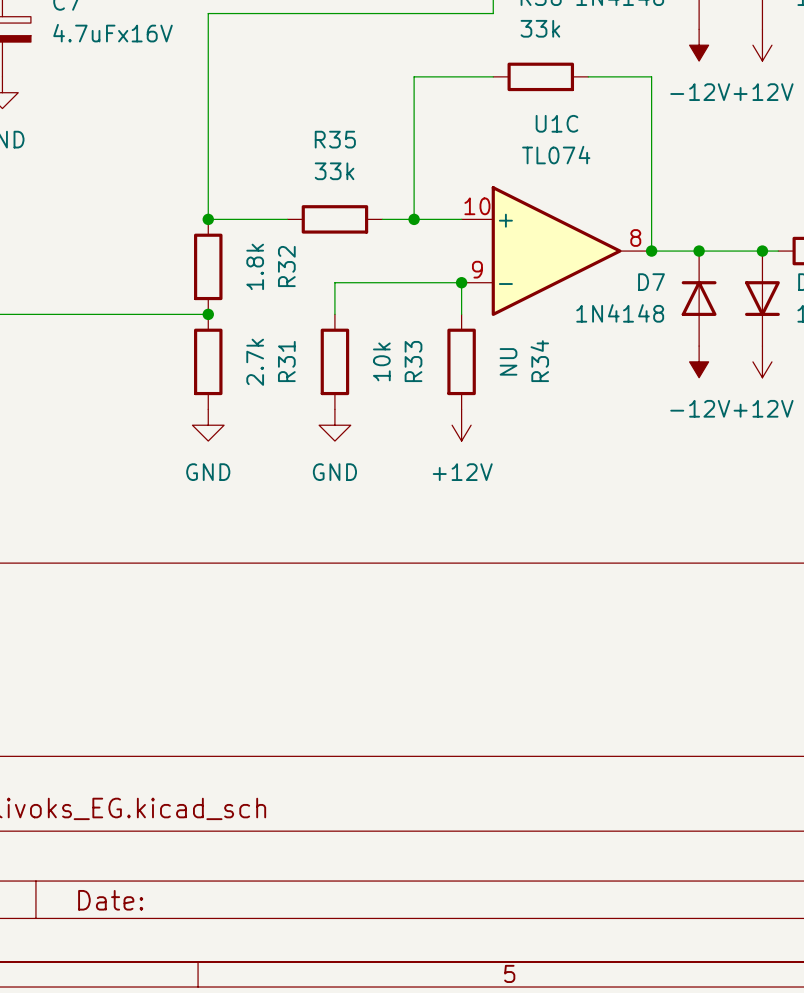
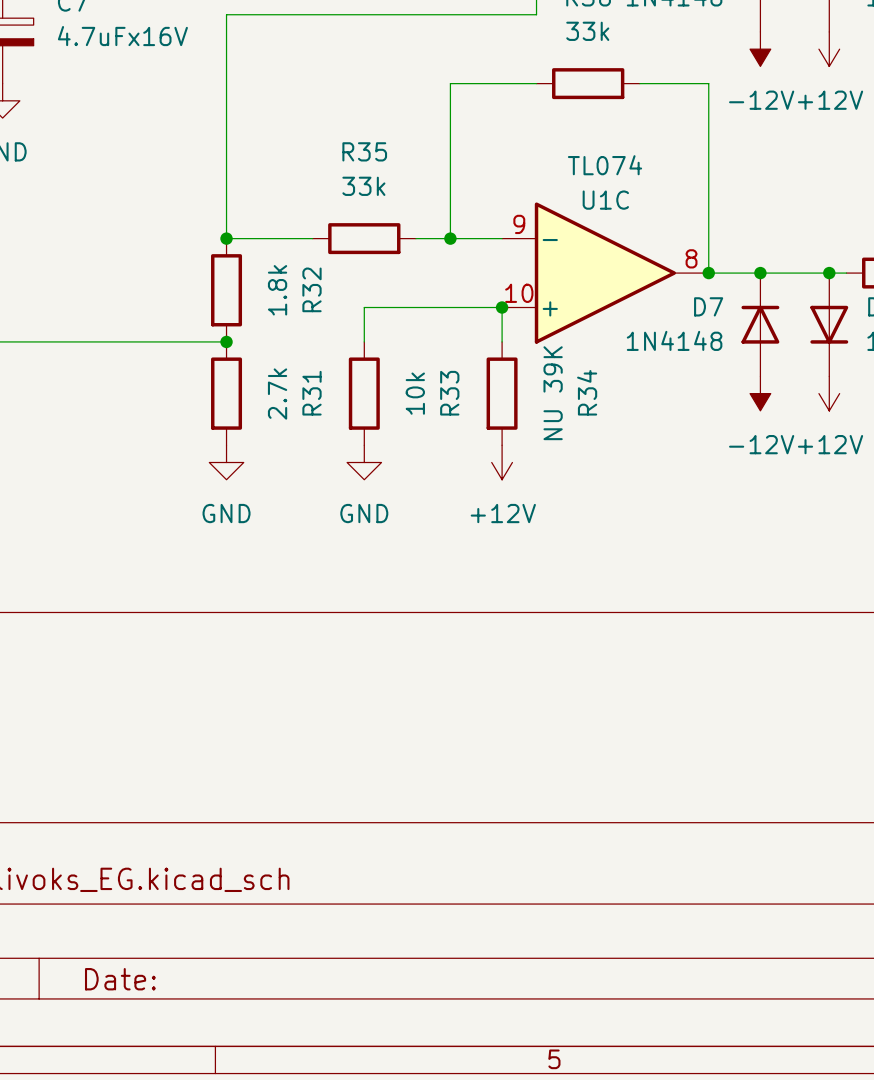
U1C name position: U1C (556, 123) -> U1C (605, 200)
U1C flip: as is (556, 251) -> up-down (605, 273)
R34 value: NU (508, 361) -> NU 39K (553, 393)

